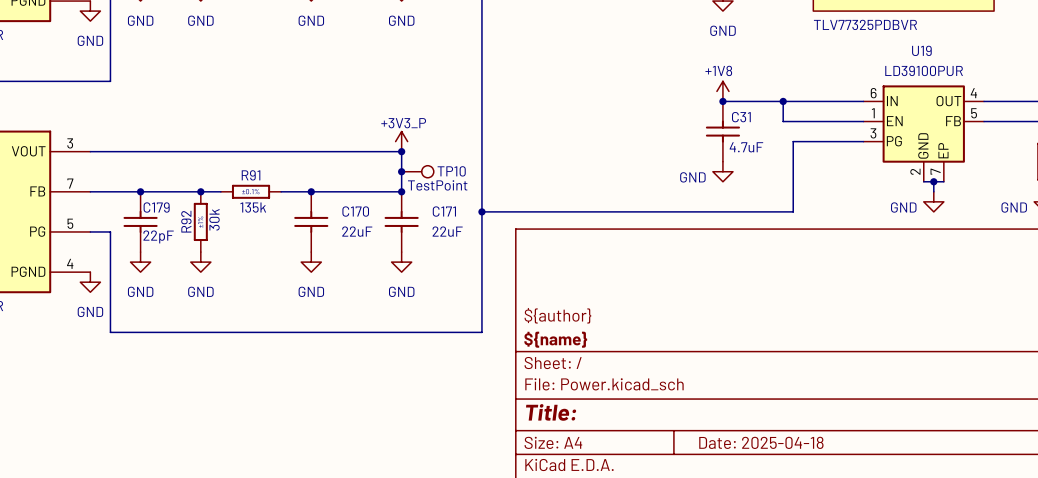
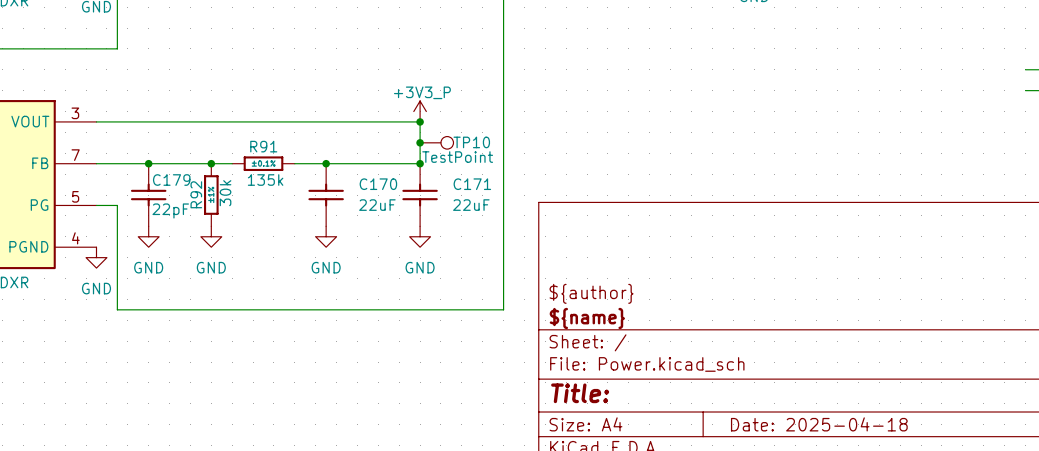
power symbol: +1V8 (722, 91) -> none
wire: (722, 101) (863, 101) -> none
junction: (722, 101) -> none
wire: (783, 101) (783, 121) (863, 121) -> none
junction: (783, 101) -> none
C31: (722, 131) -> none
U19: LD39100PUR (923, 133) -> none
wire: (863, 141) (793, 141) (793, 211) (481, 211) -> none
power symbol: GND (722, 171) -> none
wire: (923, 181) (943, 181) -> none
wire: (933, 181) (933, 191) -> none
junction: (933, 181) -> none
power symbol: GND (933, 201) -> none
junction: (481, 211) -> none

